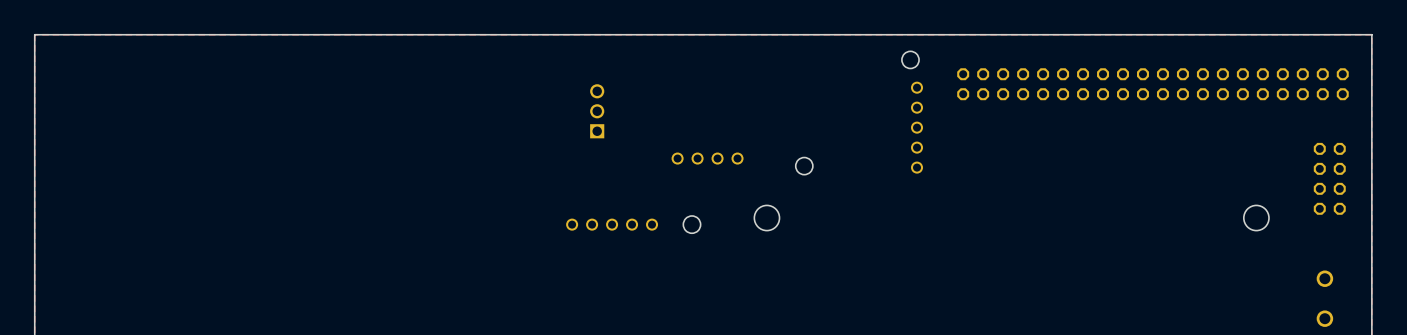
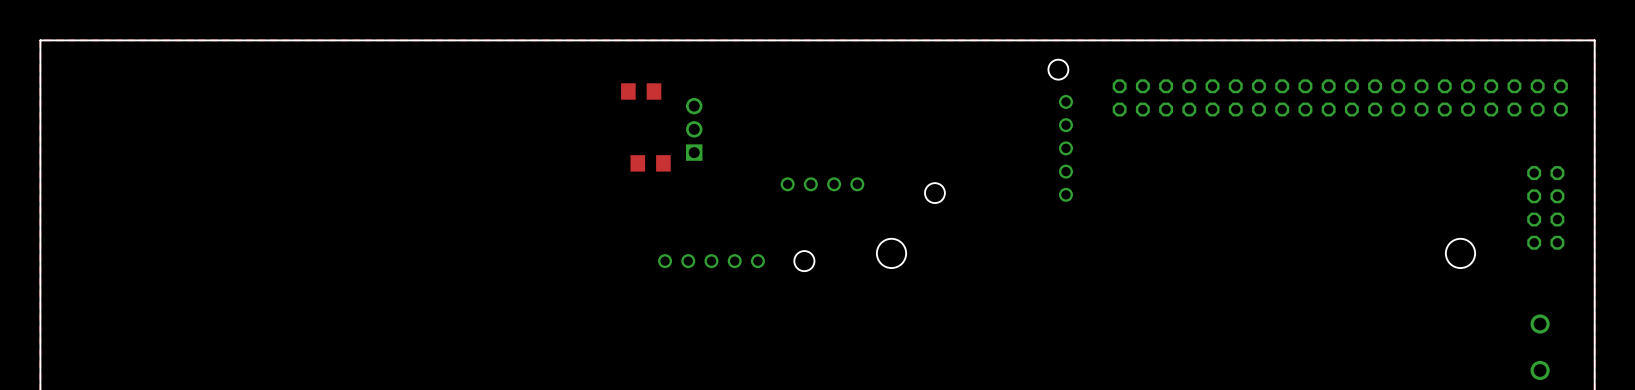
part: none -> (641, 91)
part: none -> (650, 163)

